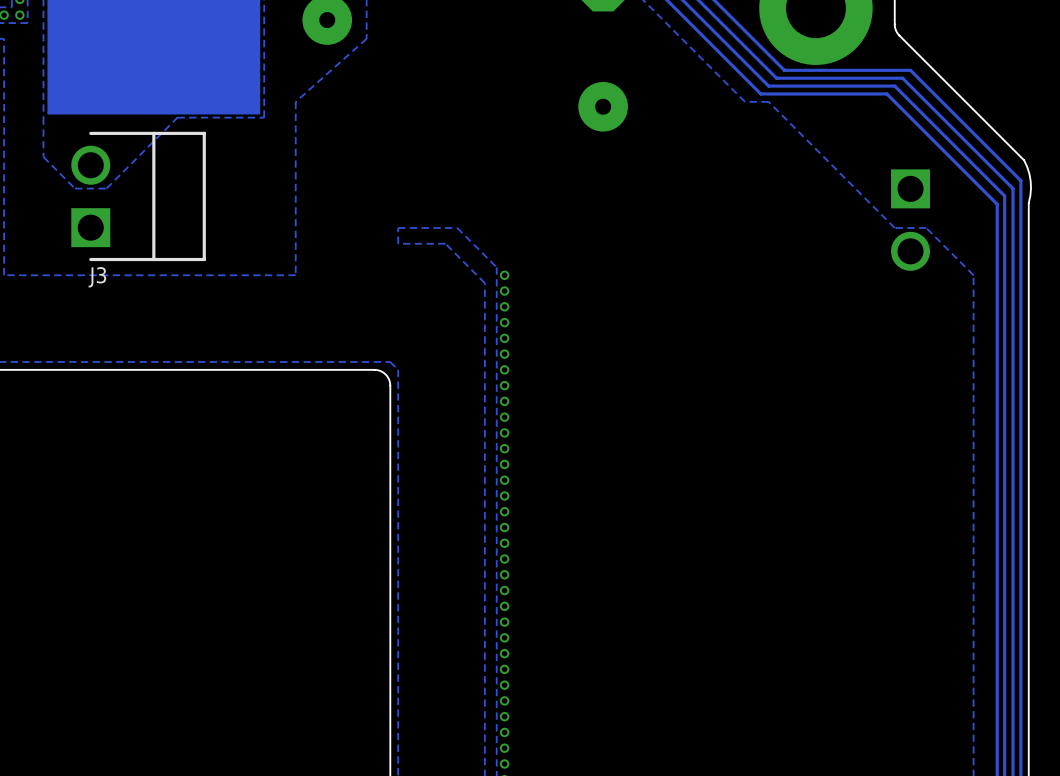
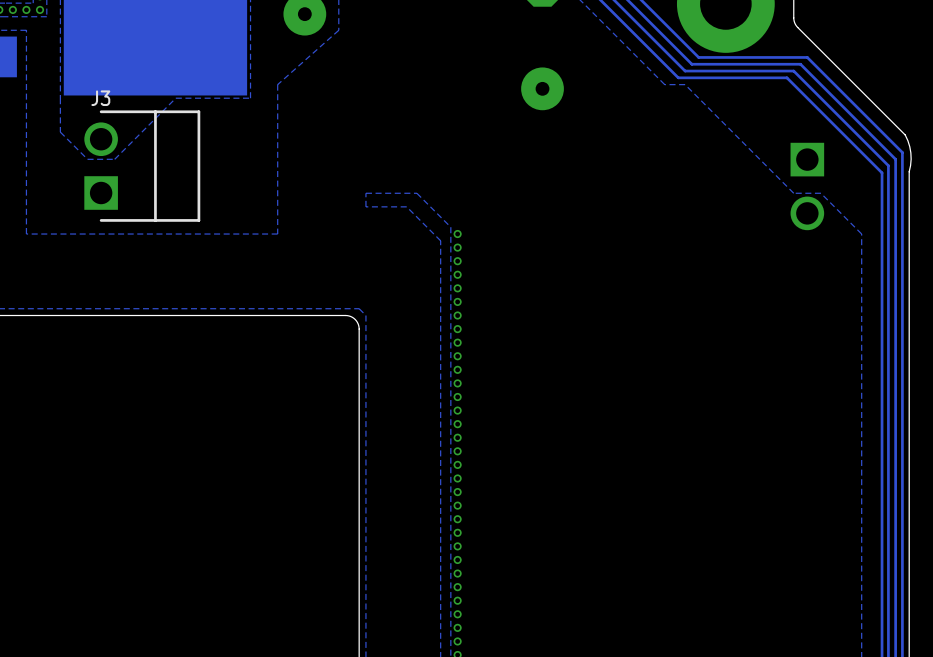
J3 name position: J3 (97, 277) -> J3 (100, 98)

